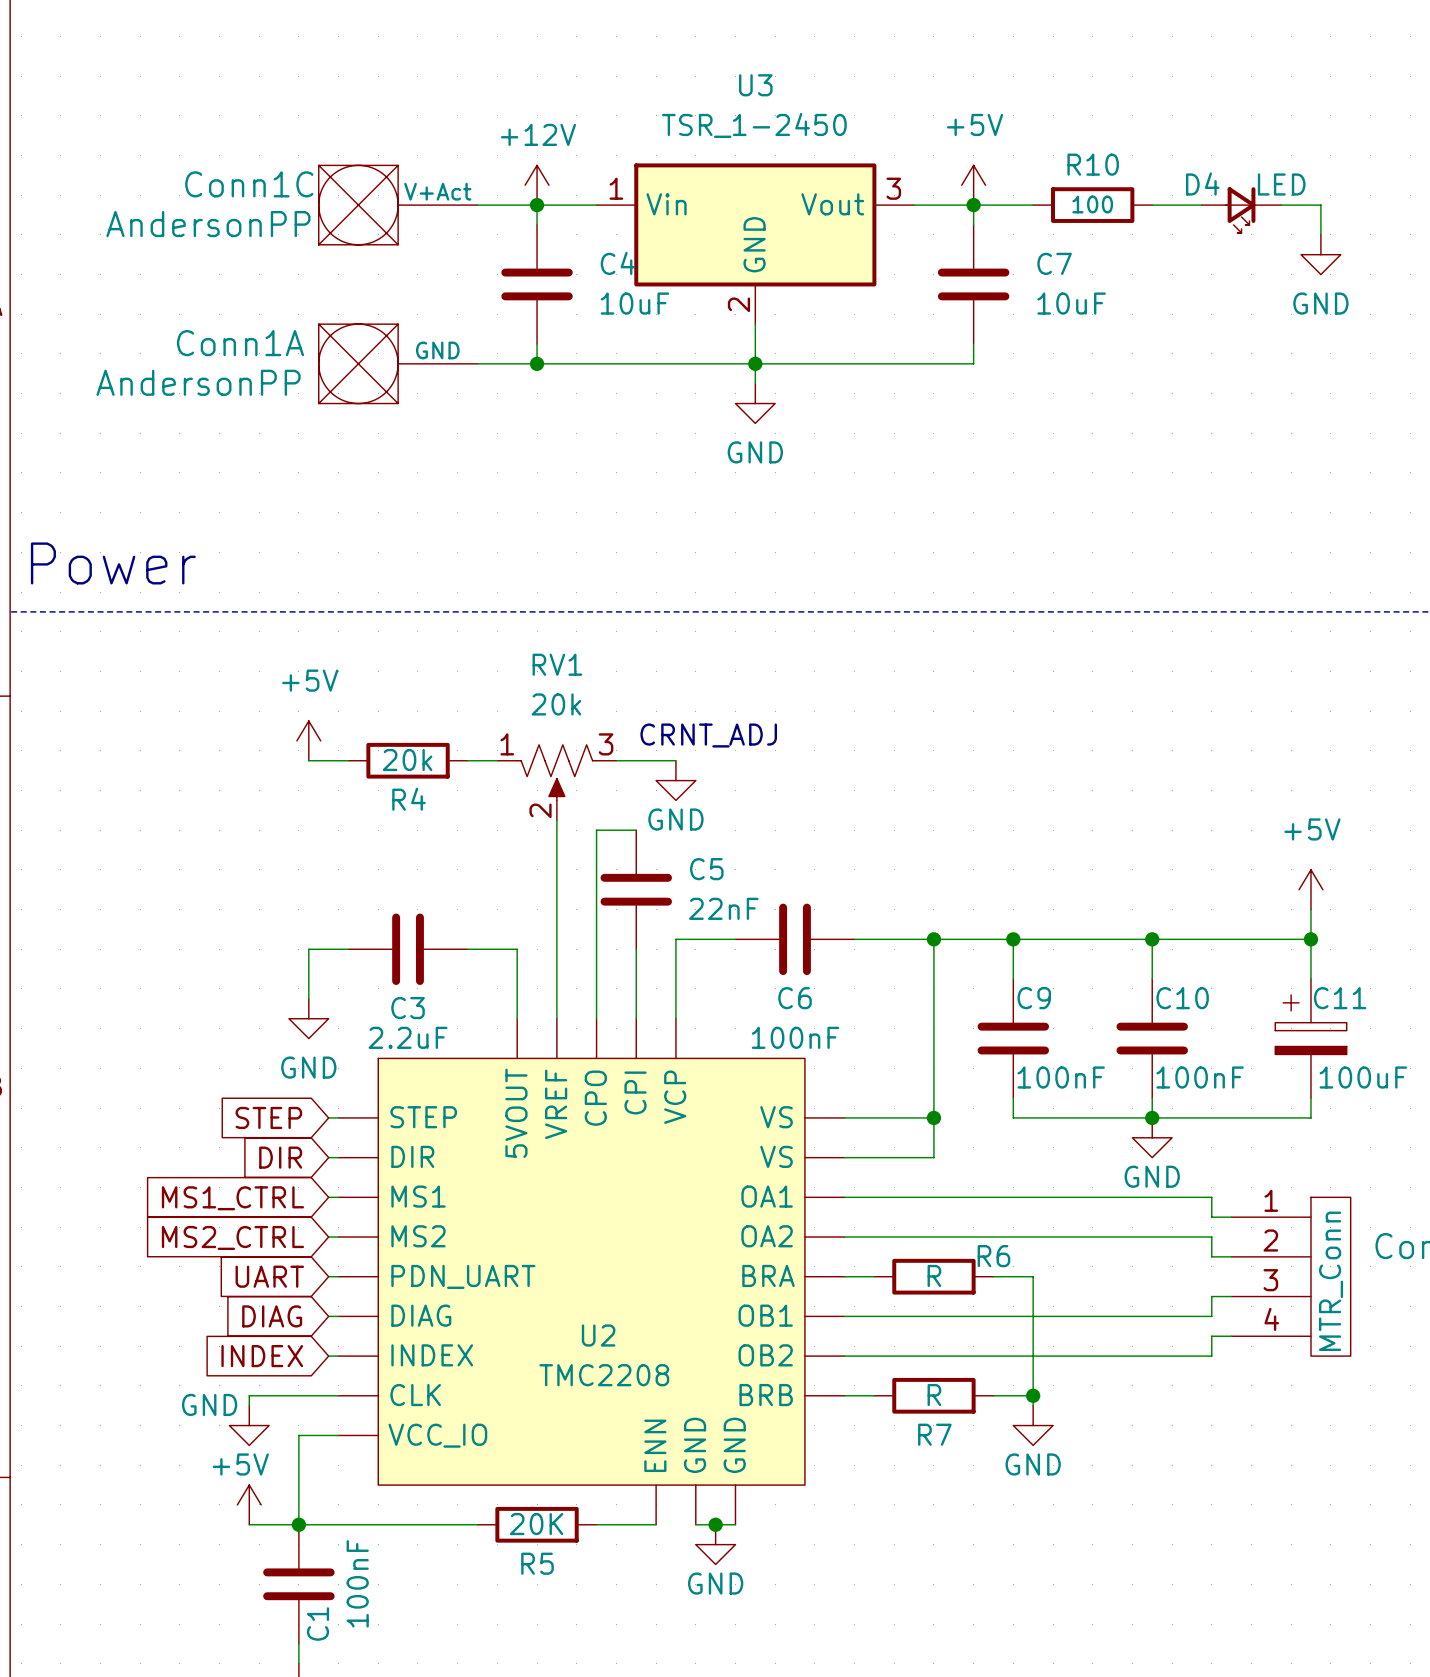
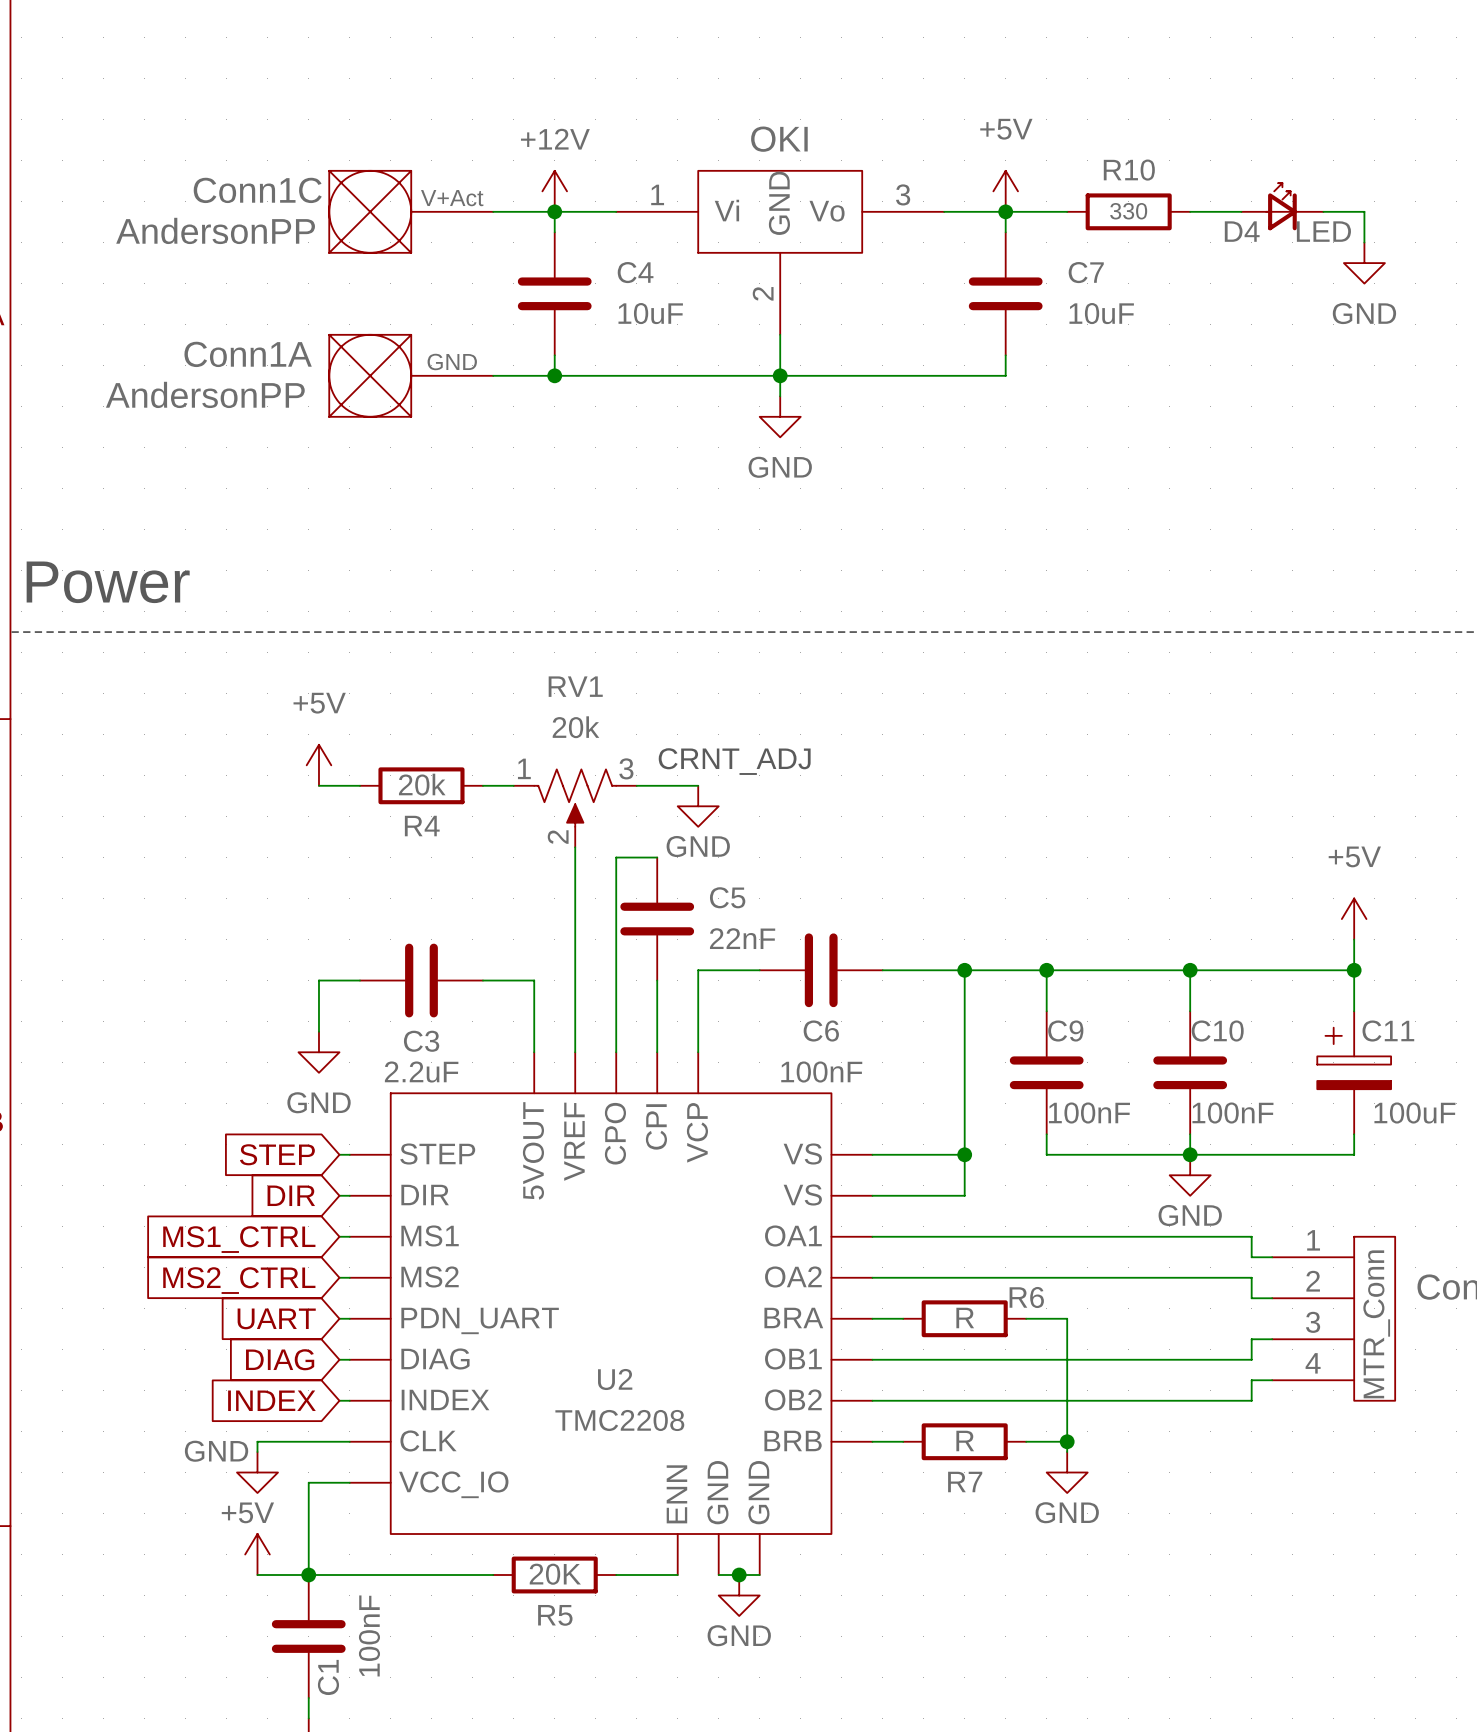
R10 value: 100 (1092, 204) -> 330 (1128, 211)
D4 flip: as is (1240, 210) -> up-down (1281, 206)
U3: TSR_1-2450 (755, 243) -> none
part: none -> OKI (780, 252)

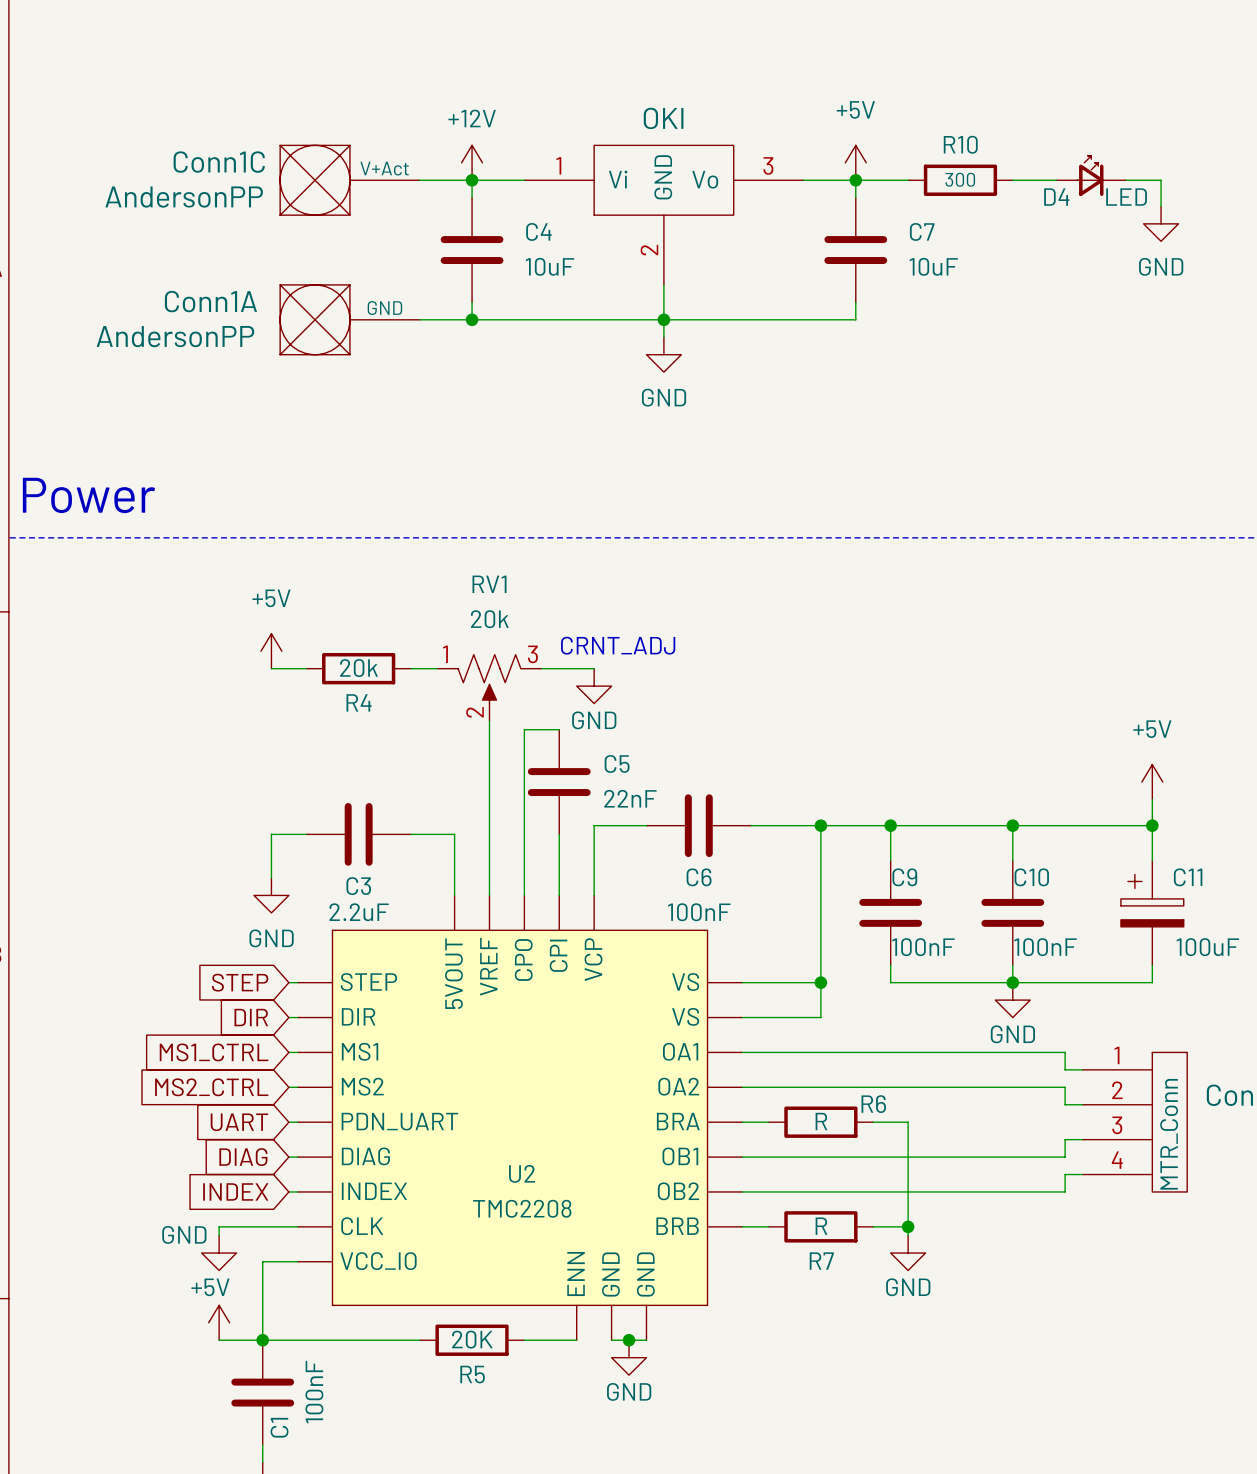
R10 value: 330 (1128, 211) -> 300 (960, 179)

